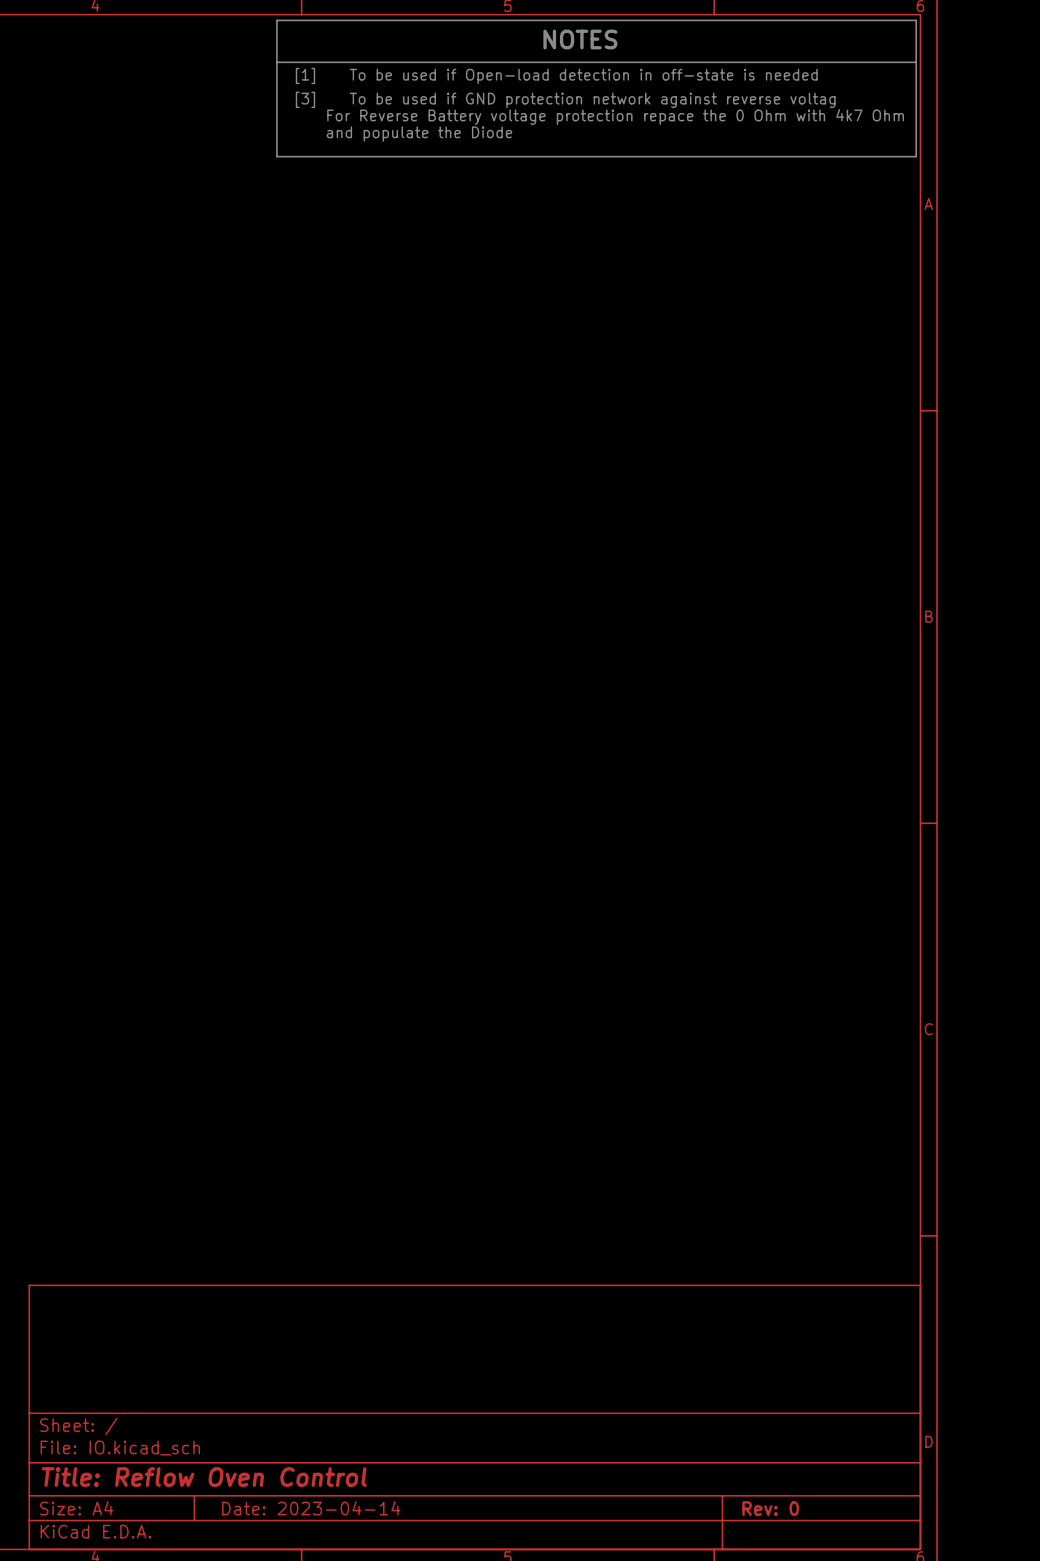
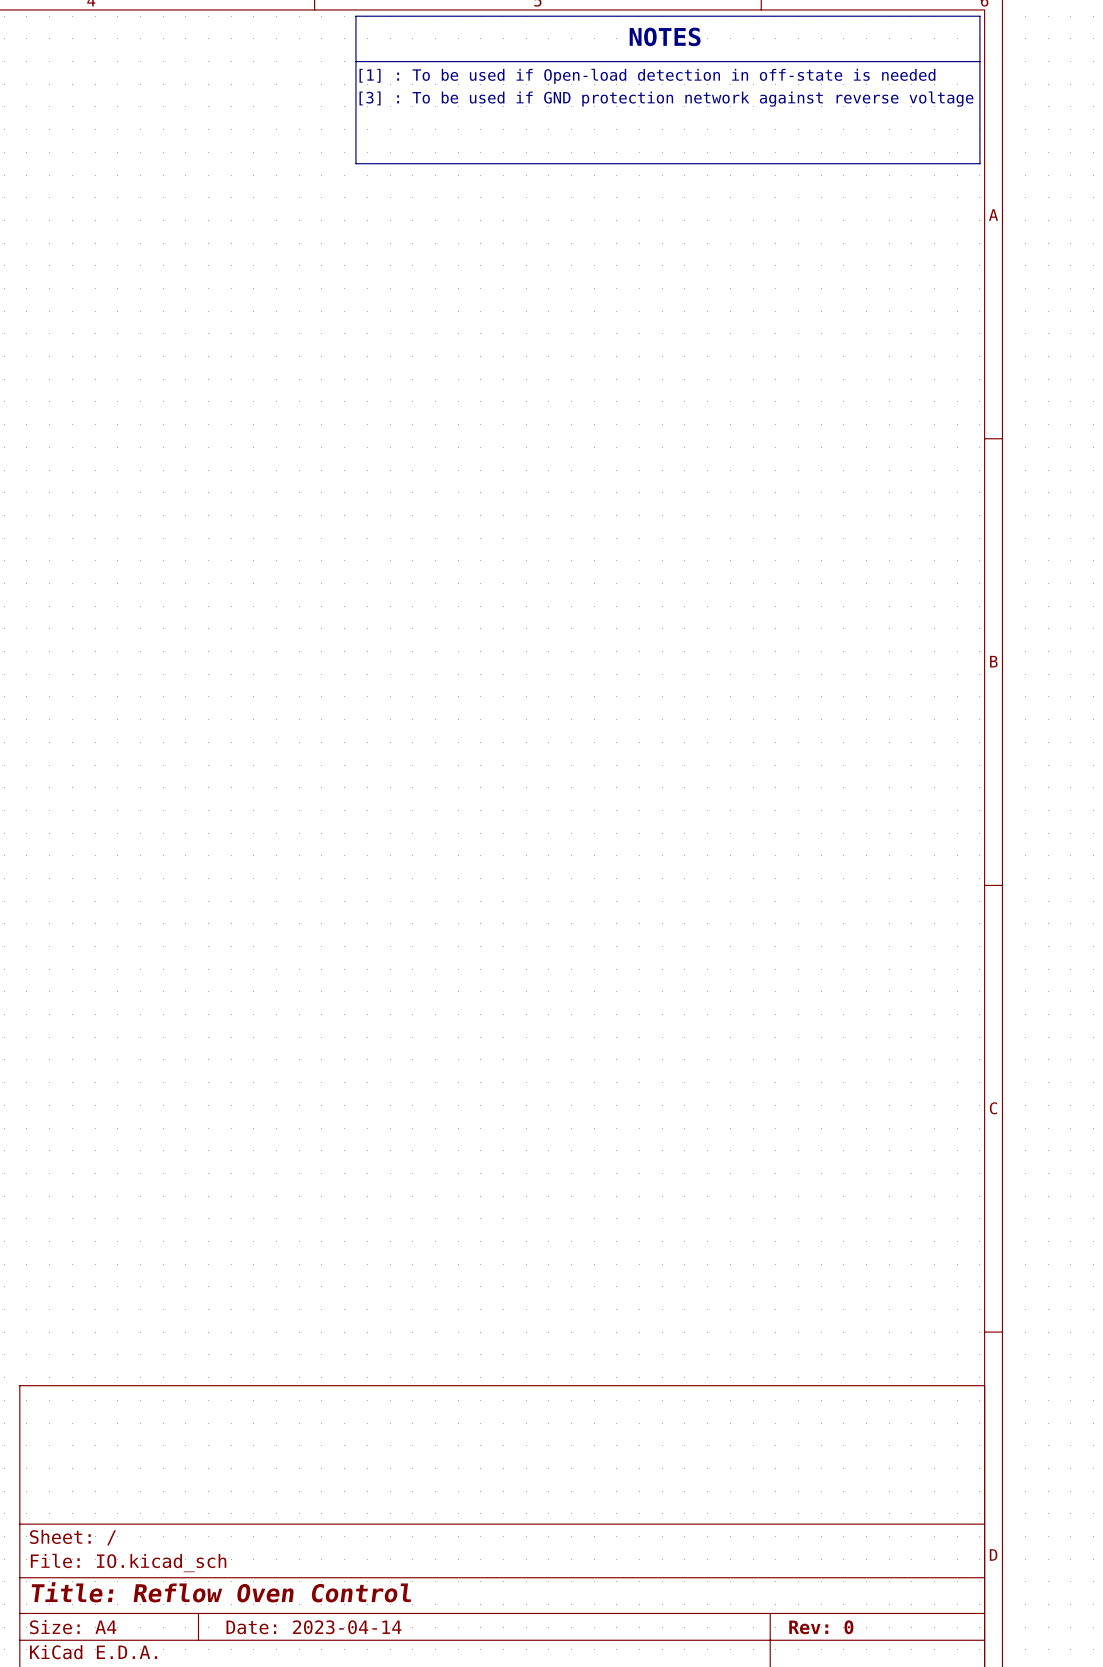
line: (339, 20) (276, 20) (276, 156) (339, 156) -> (355, 16) (355, 163)
text position: NOTES (580, 39) -> NOTES (665, 36)
line: (276, 62) (339, 62) -> none
text: [1] To be used if Open-load detection in off-state is needed (556, 75) -> [1] : To be used if Open-load detection in off-state is needed (647, 76)
text: [3] To be used if GND protection network against reverse voltag (565, 99) -> [3] : To be used if GND protection network against reverse voltage (666, 99)
text: For Reverse Battery voltage protection repace the 0 Ohm with 4k7 Ohm (615, 116) -> none
text: and populate the Diode (419, 134) -> none

